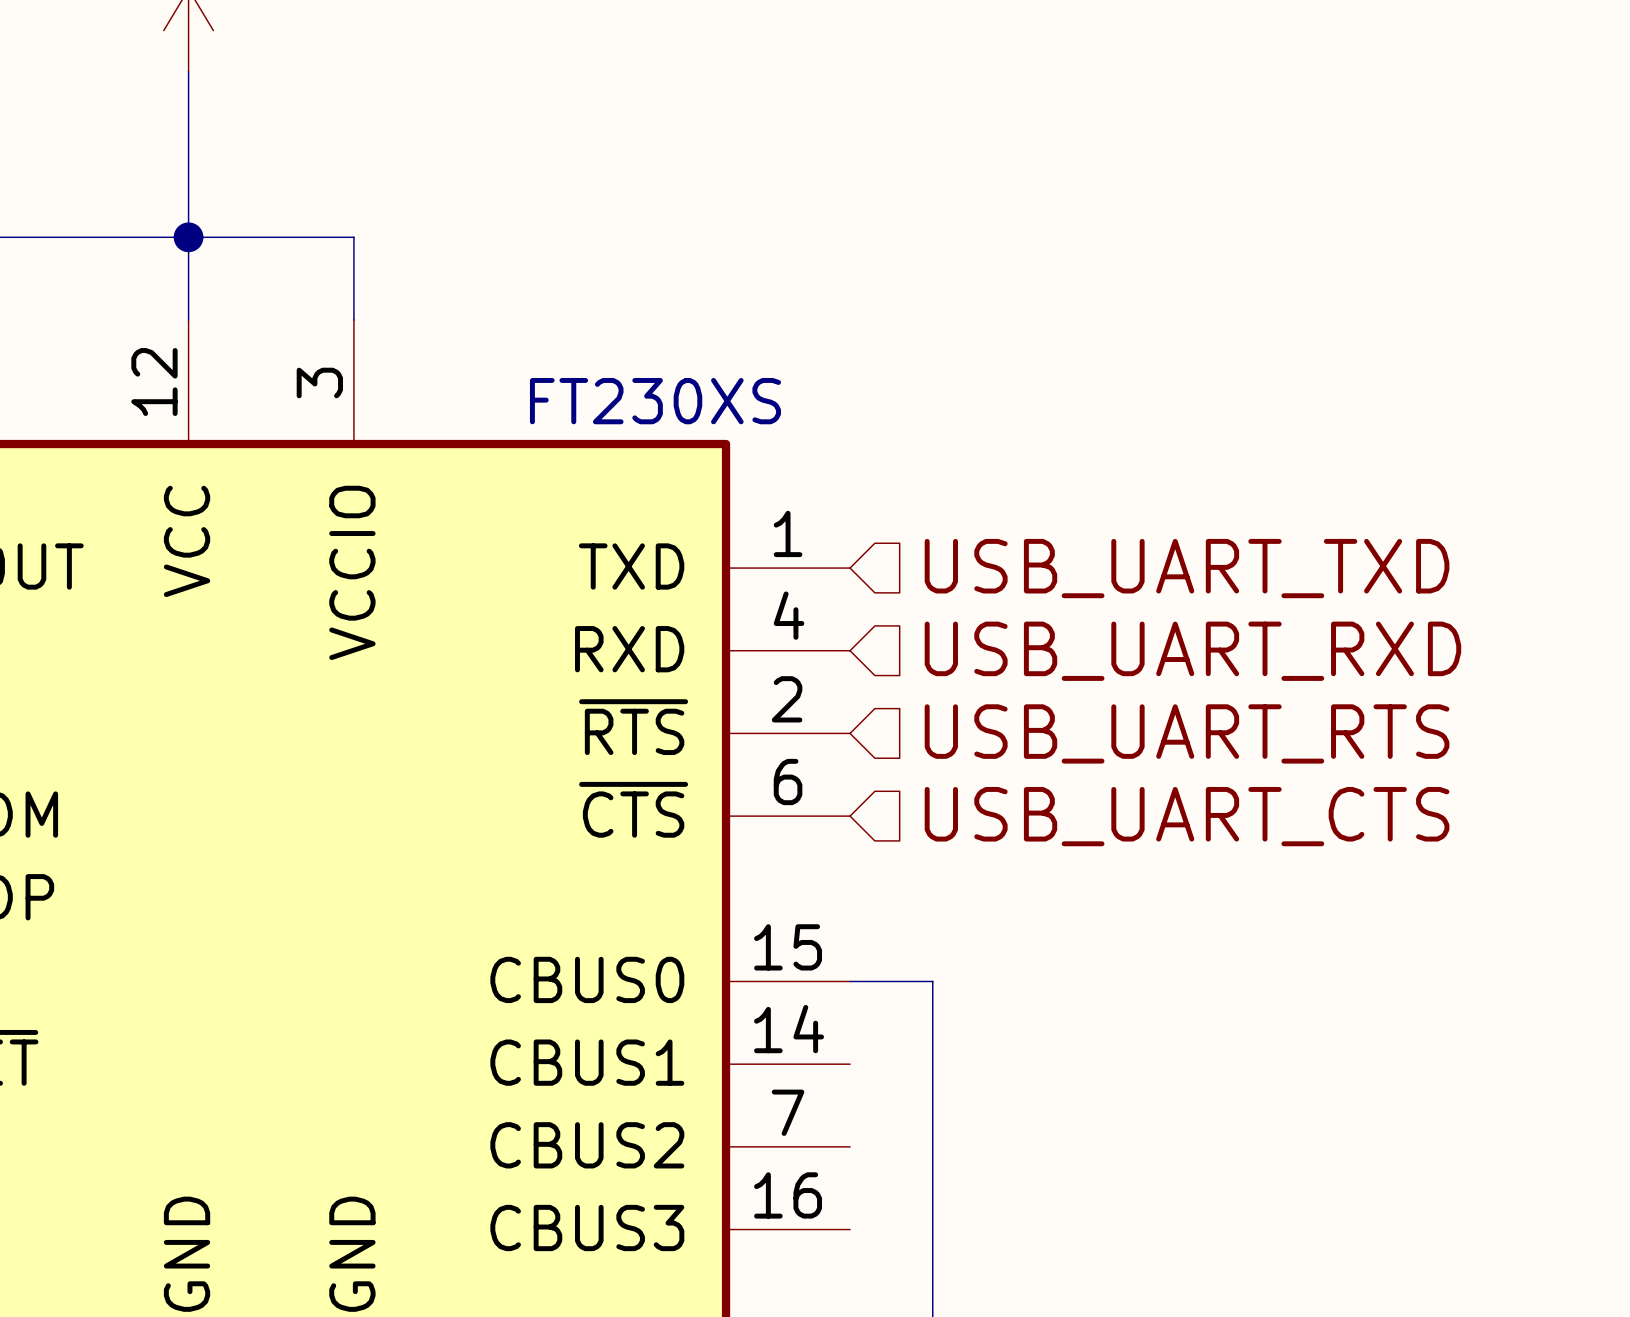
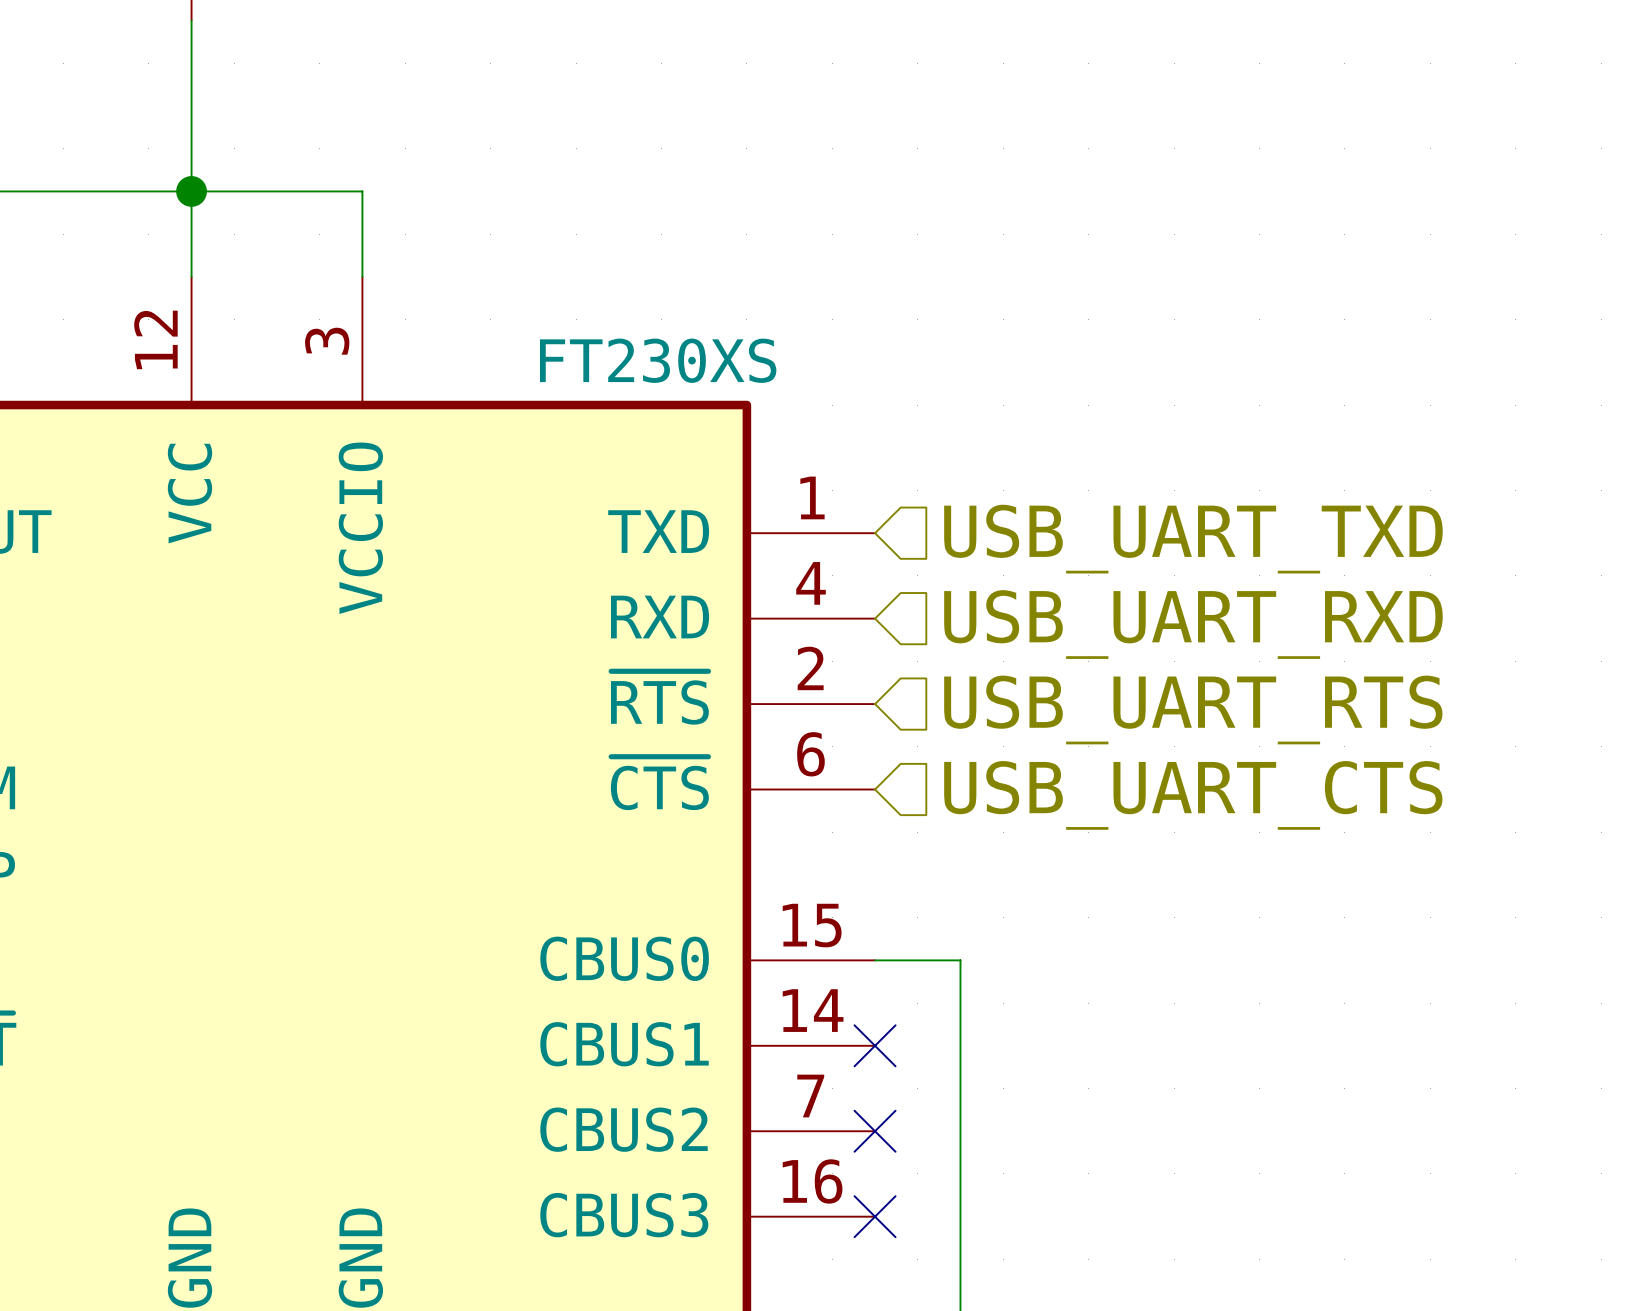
no-connect mark: none -> (875, 1045)
no-connect mark: none -> (875, 1131)
no-connect mark: none -> (875, 1216)

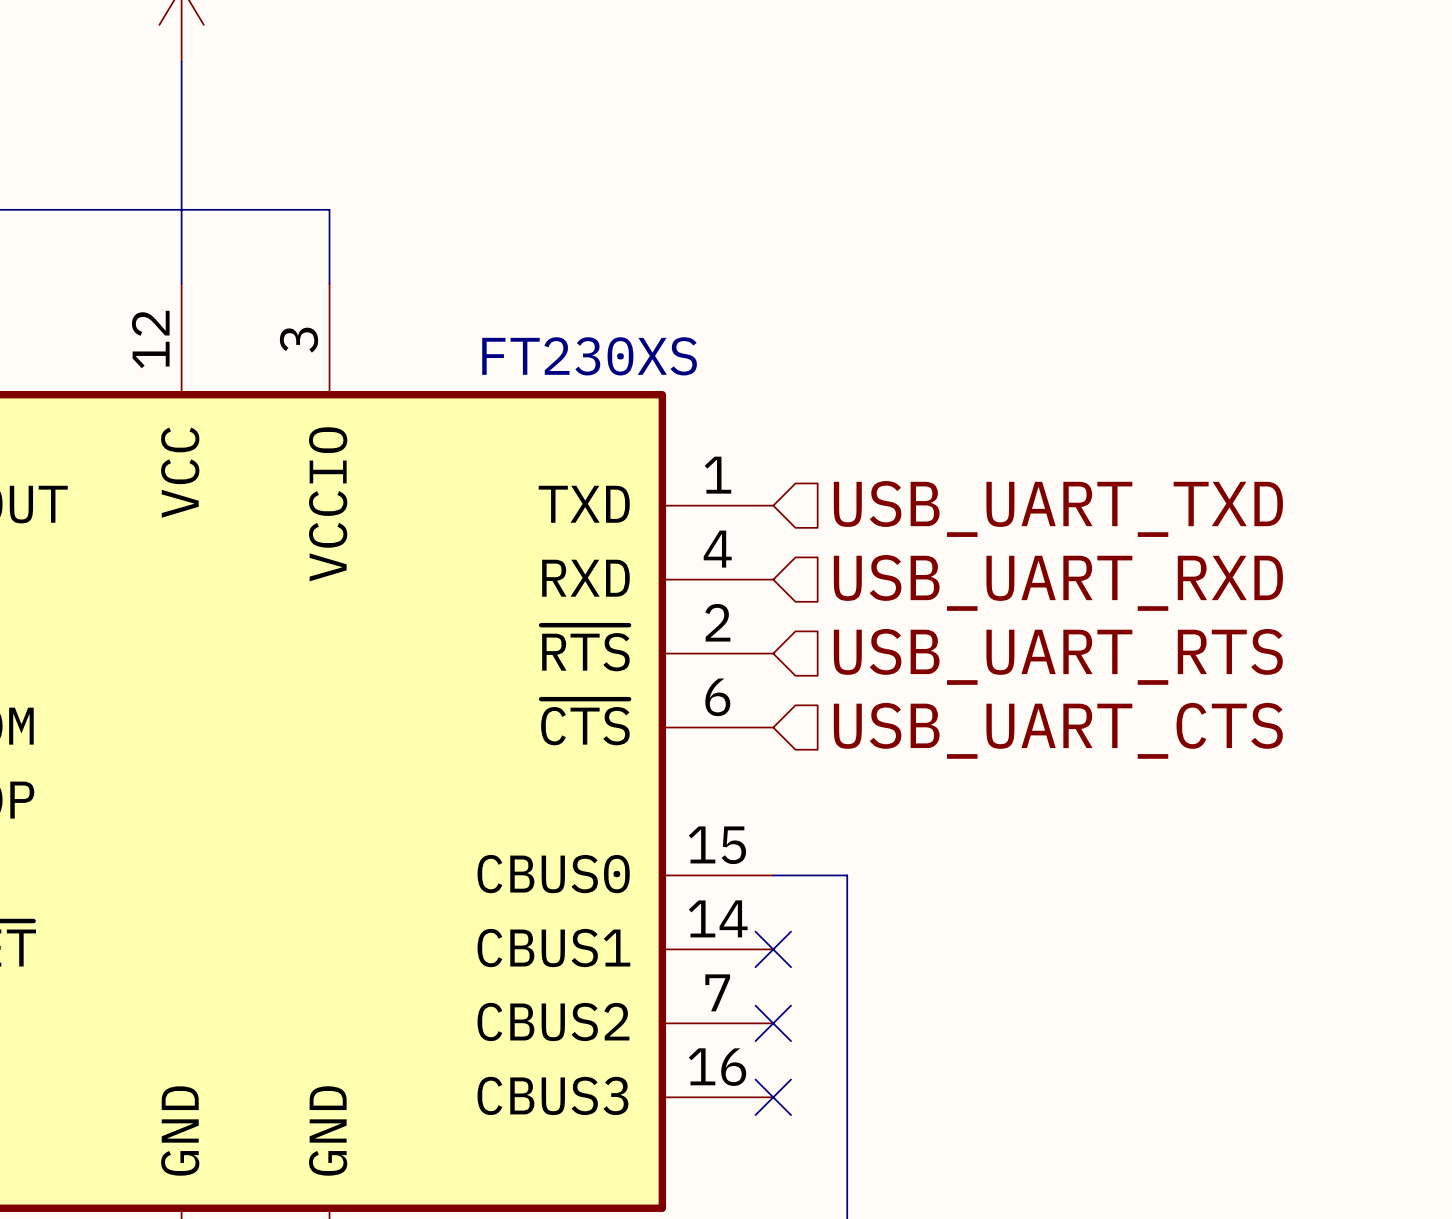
junction: (191, 191) -> none

